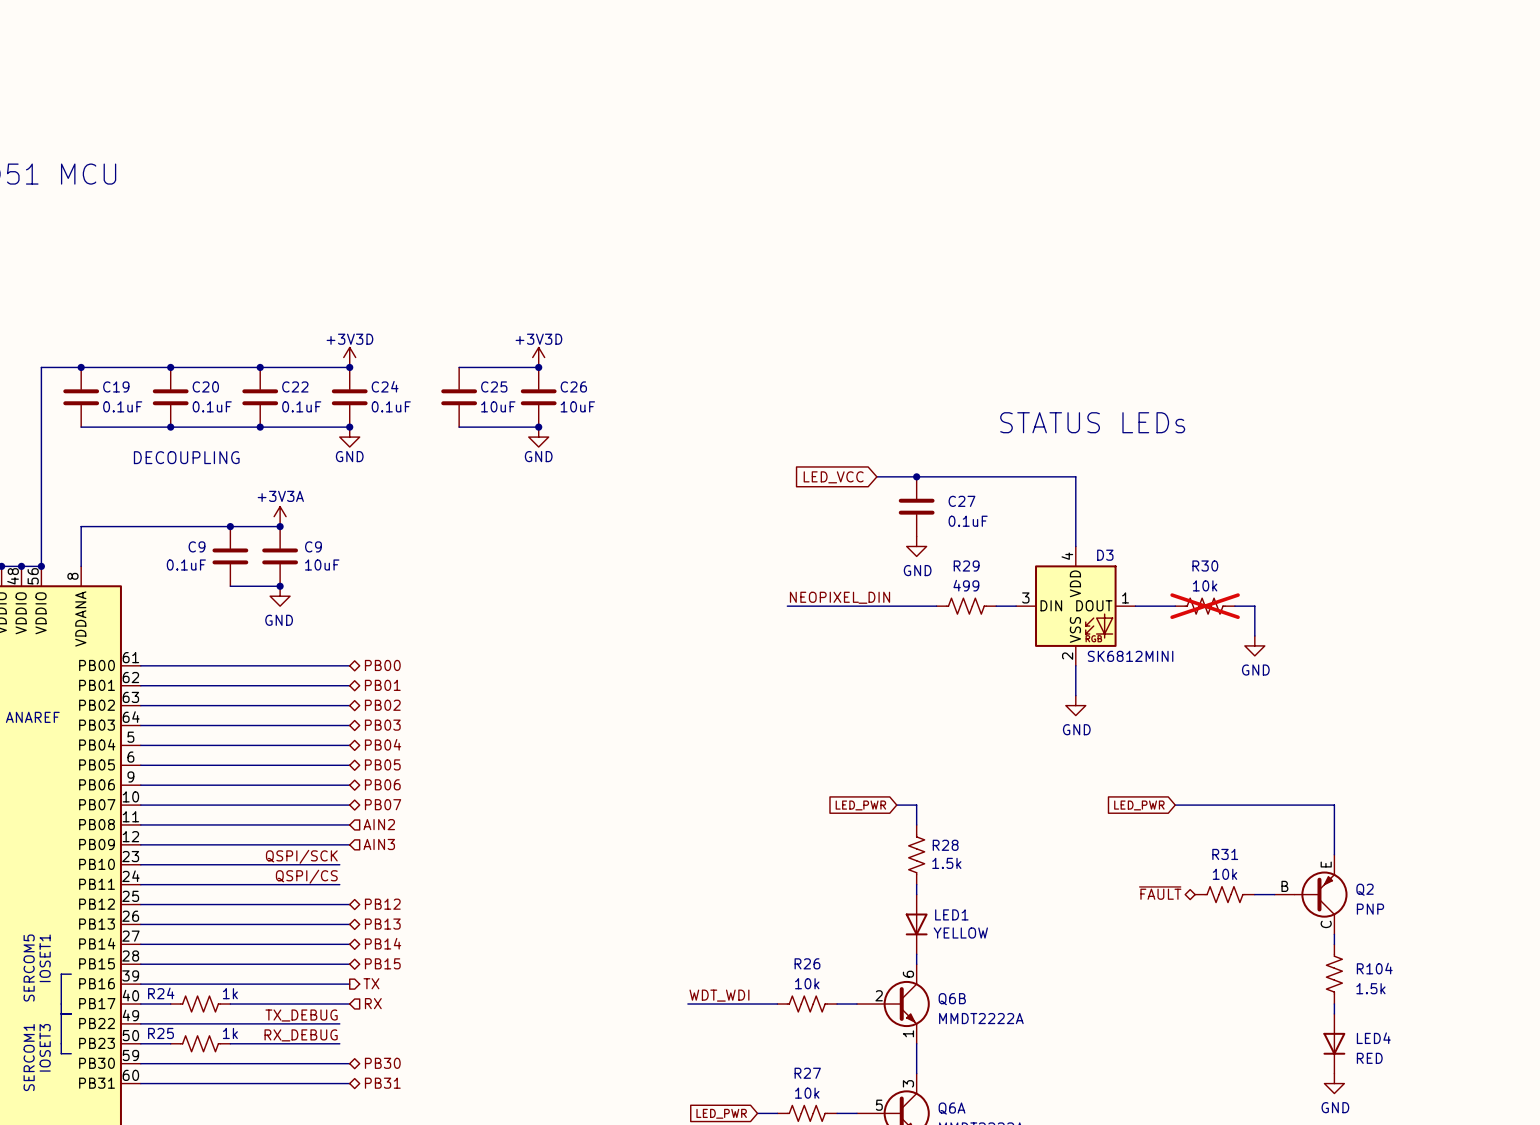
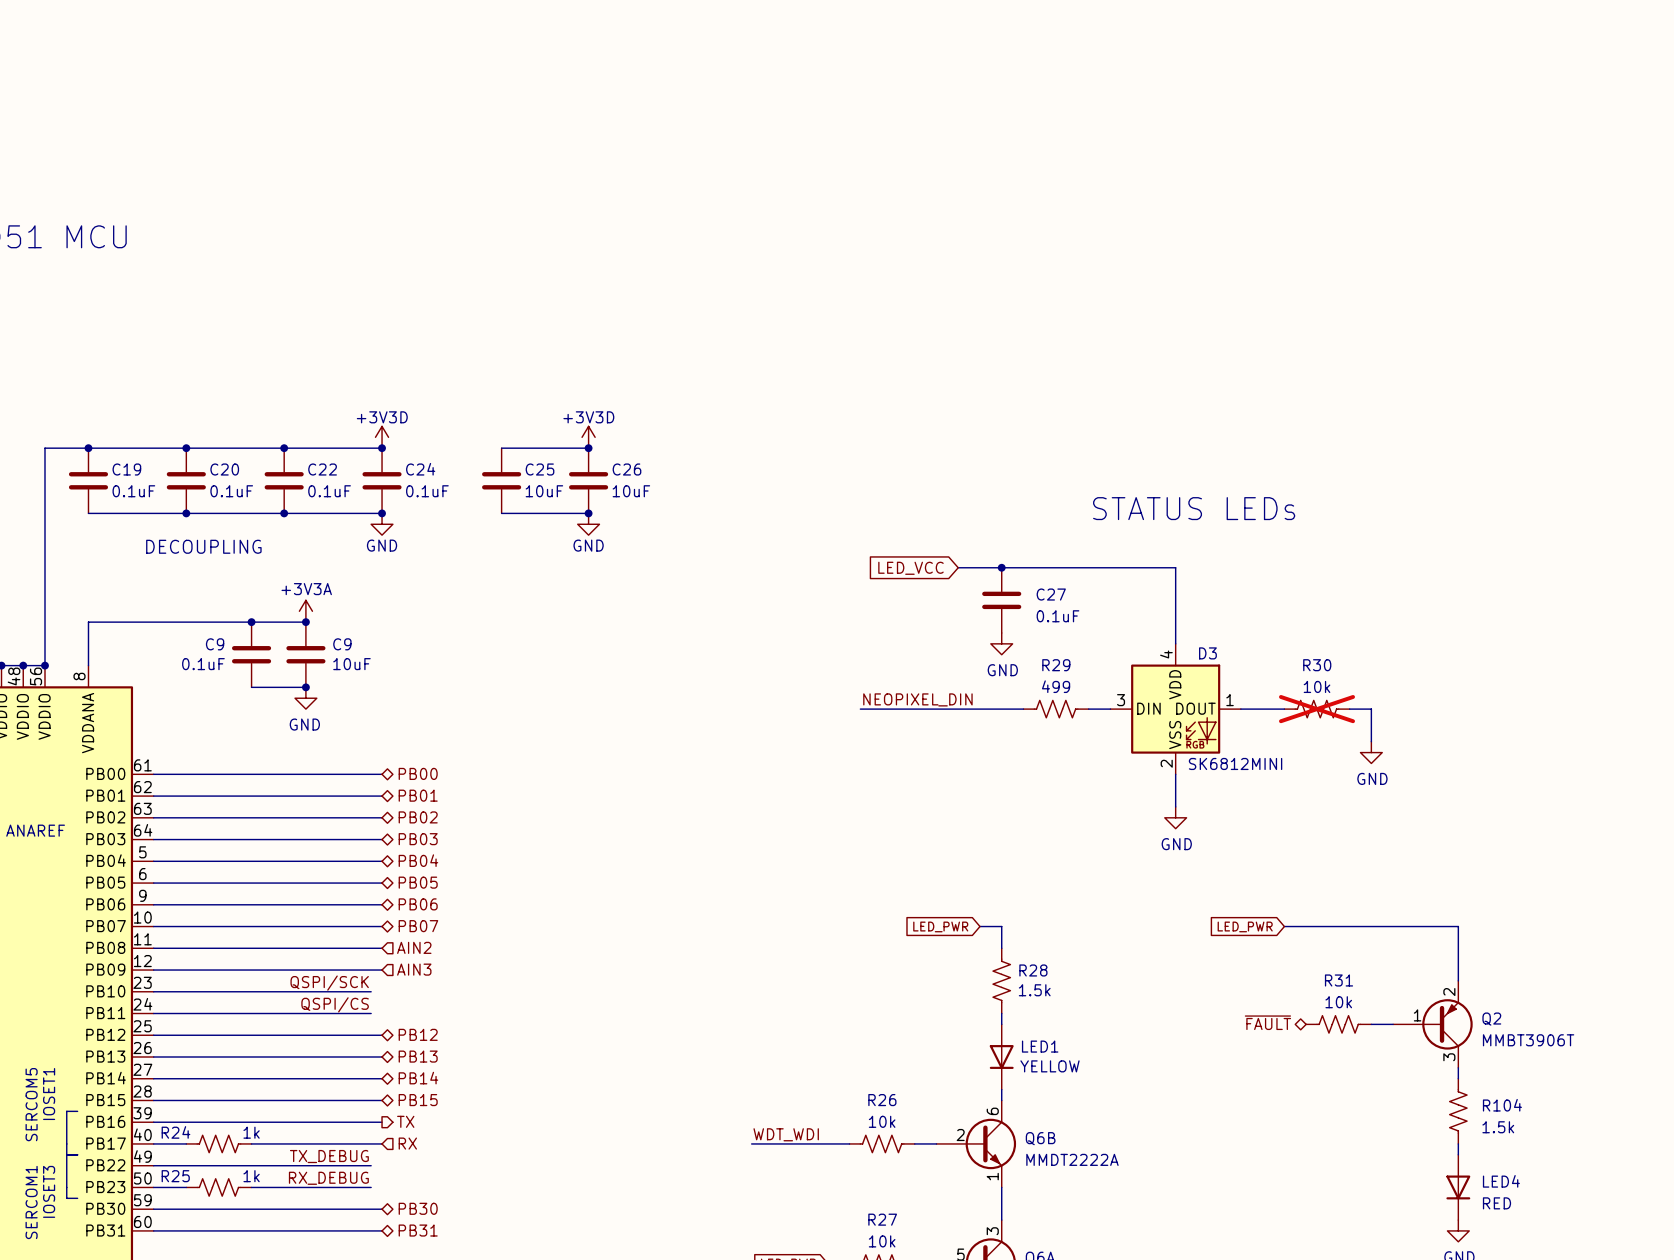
Q2 symbol: [1274, 854, 1348, 935] -> [1393, 980, 1473, 1068]
Q2 value: PNP (1370, 909) -> MMBT3906T (1528, 1040)

